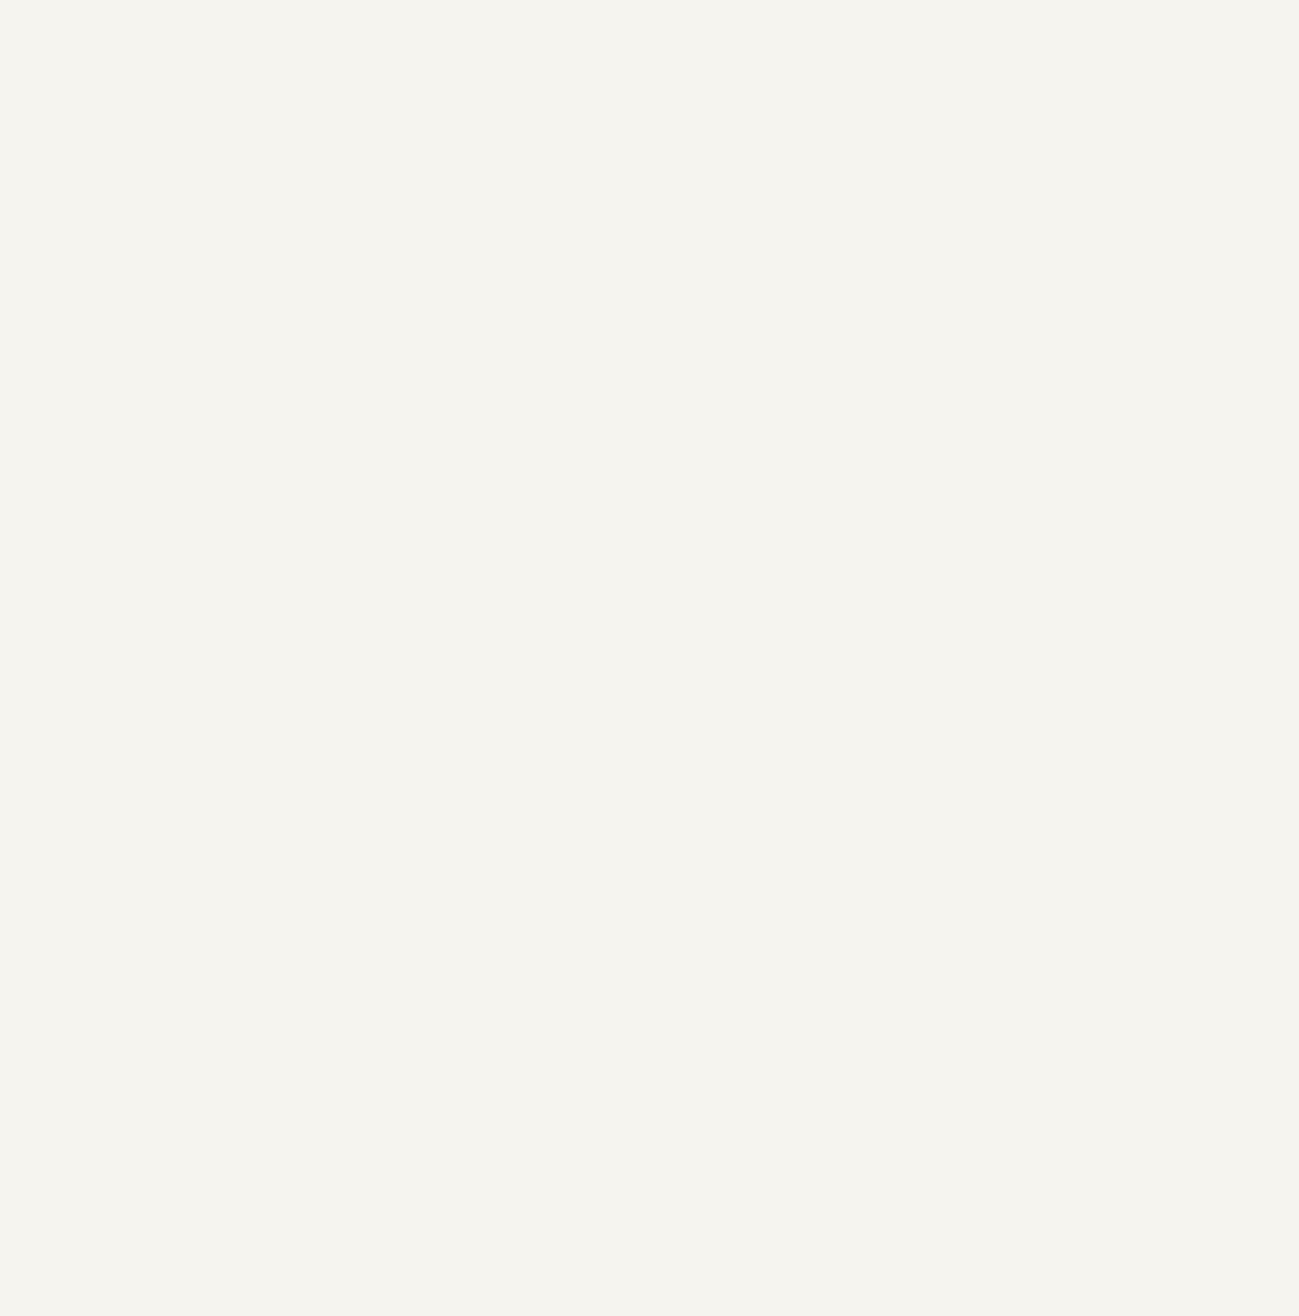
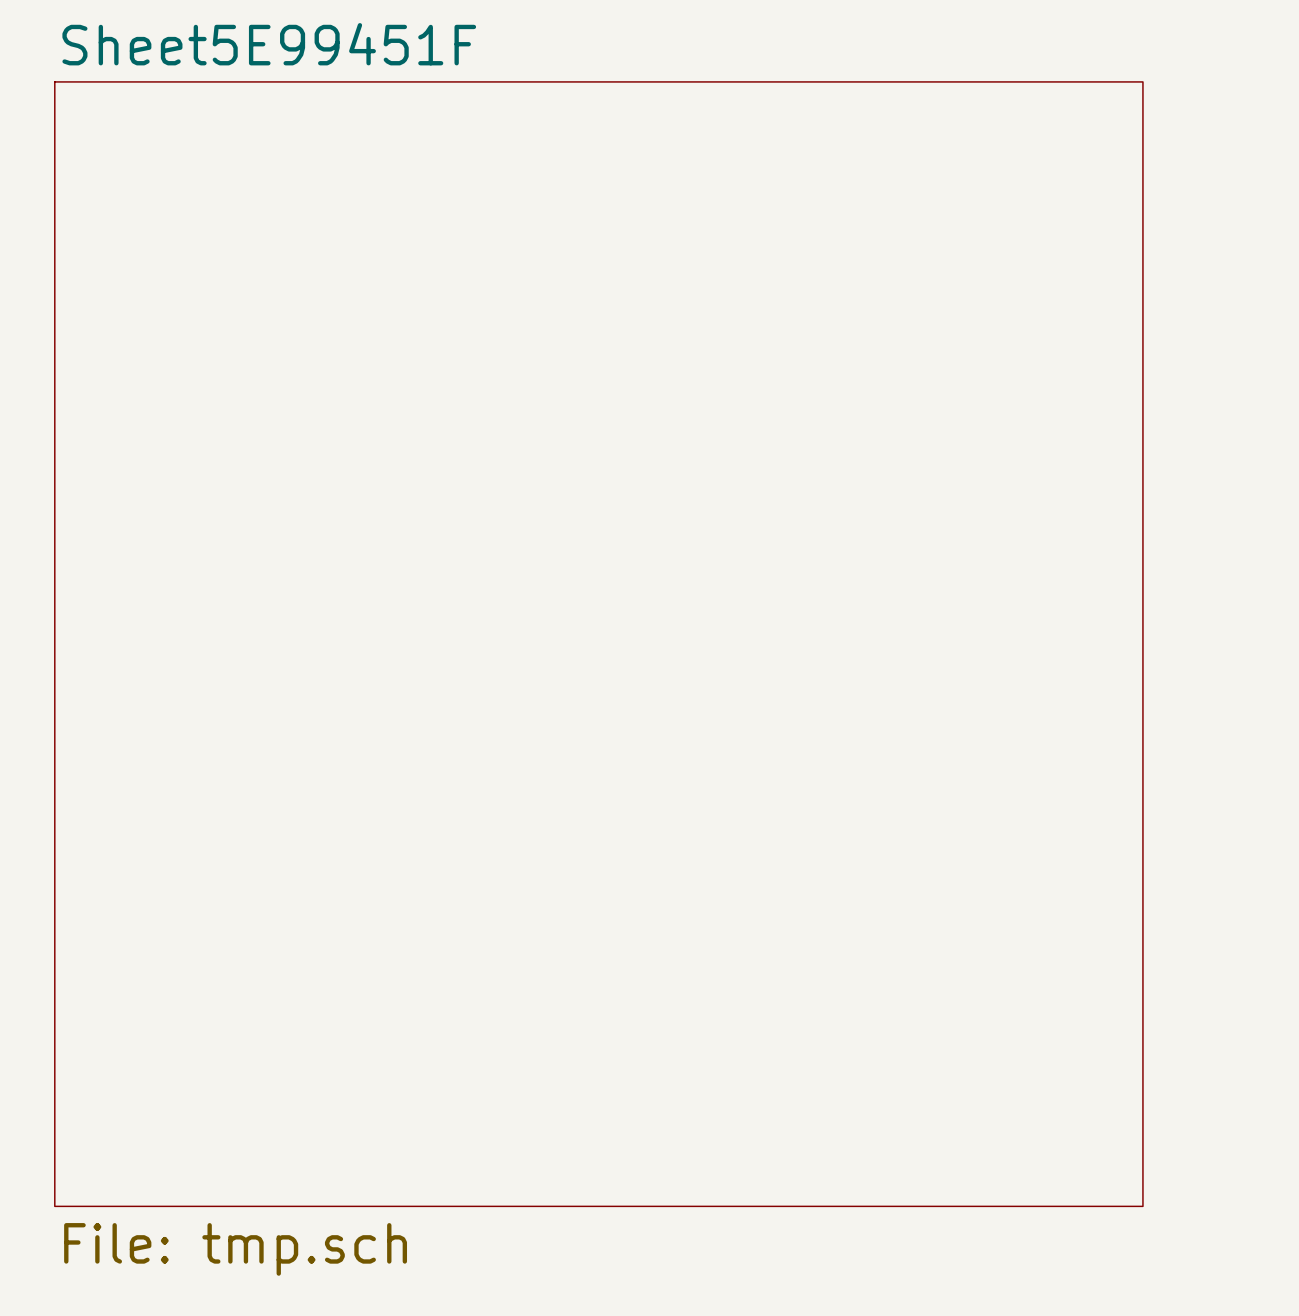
sheet Sheet5E99451F: none -> File: tmp.sch (598, 644)

